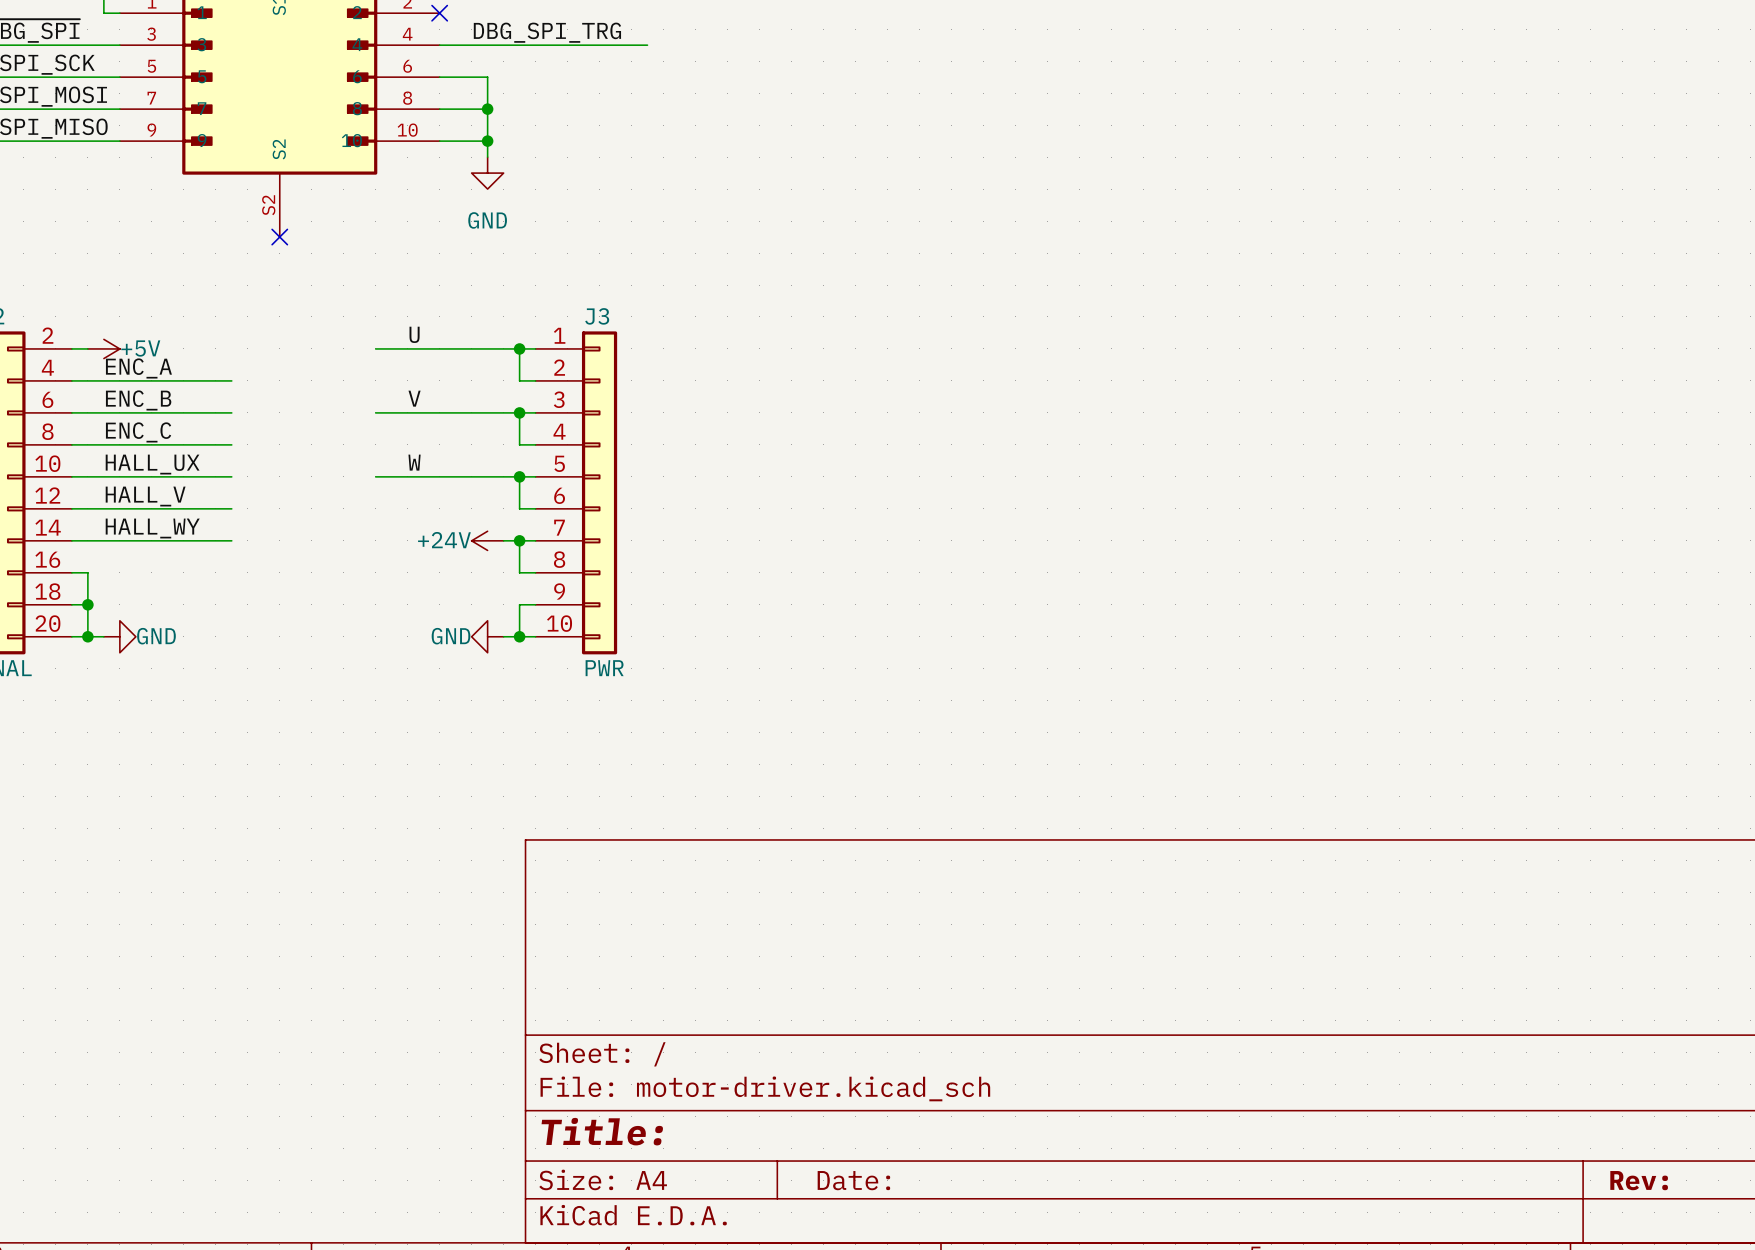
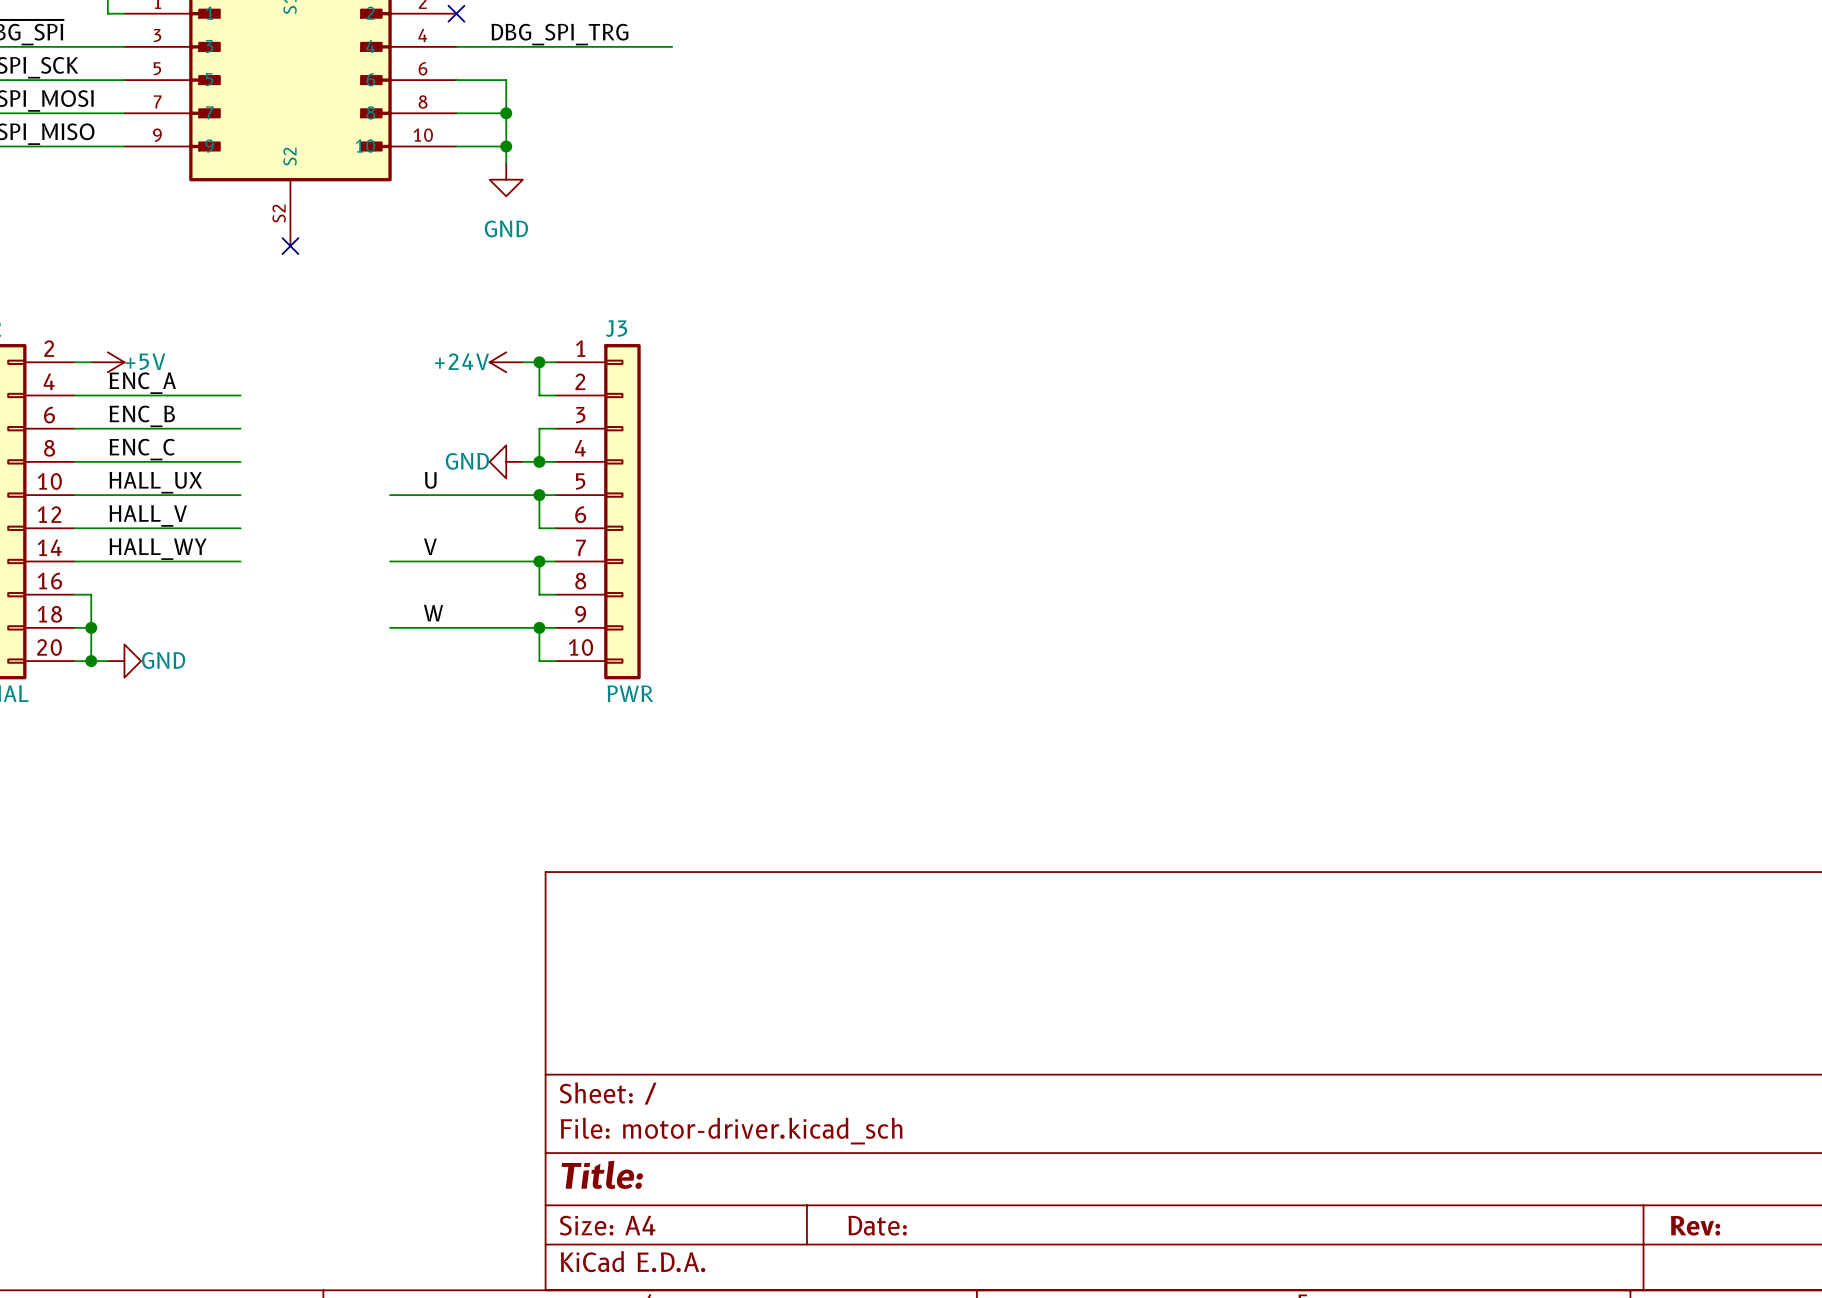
label: U (414, 334) -> none
wire: (375, 348) (503, 348) -> (390, 561) (522, 561)
label position: V (414, 398) -> V (430, 546)
wire: (375, 412) (519, 412) -> (390, 627) (539, 627)
junction position: (519, 412) -> (539, 461)
label: W (414, 462) -> U (430, 480)
power symbol position: +24V (487, 540) -> +24V (506, 362)
label: none -> W (433, 613)
power symbol position: GND (487, 636) -> GND (506, 461)
wire: (503, 636) (519, 636) -> (522, 461) (539, 461)
junction position: (519, 636) -> (539, 627)

